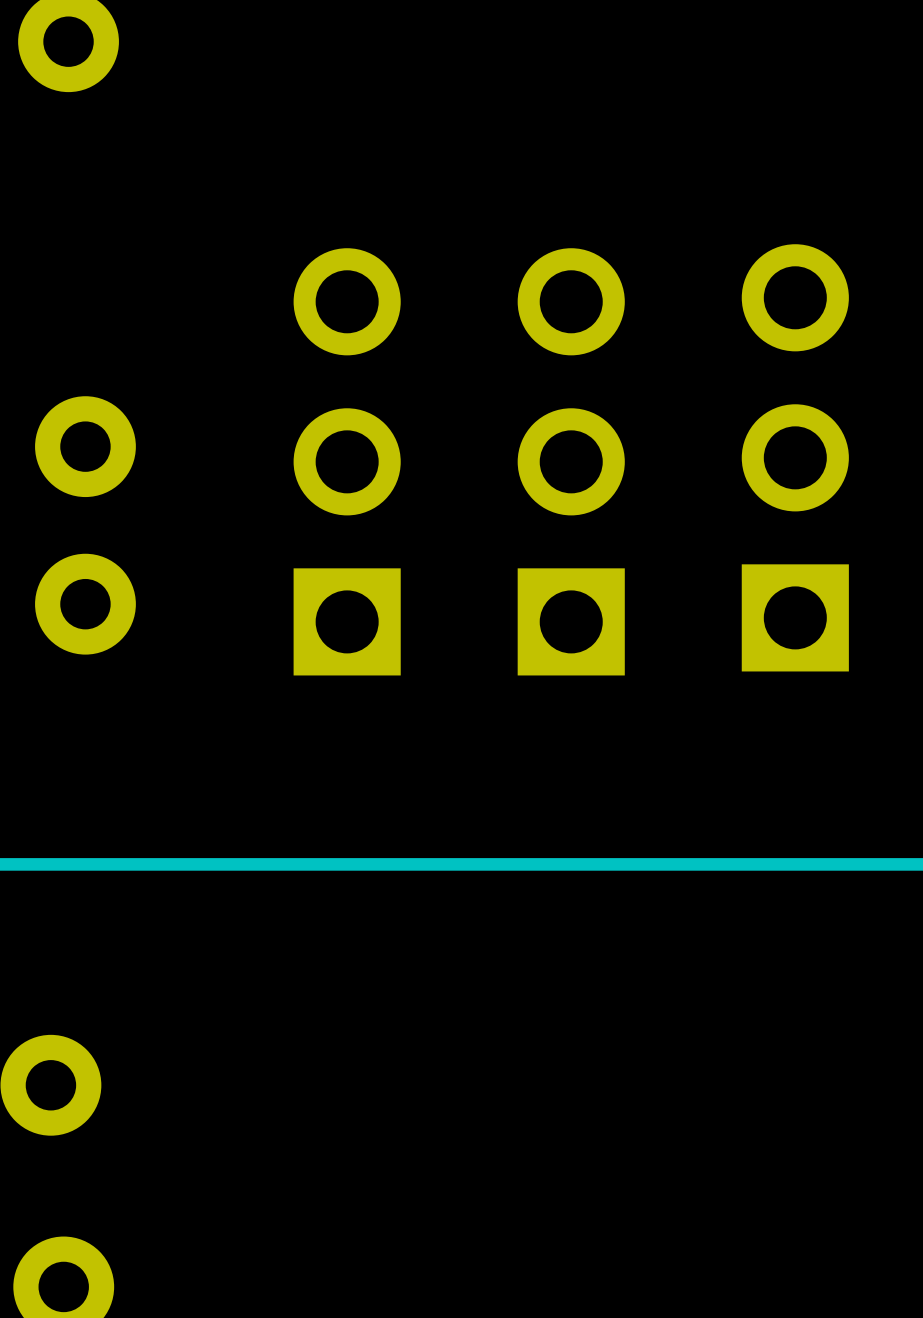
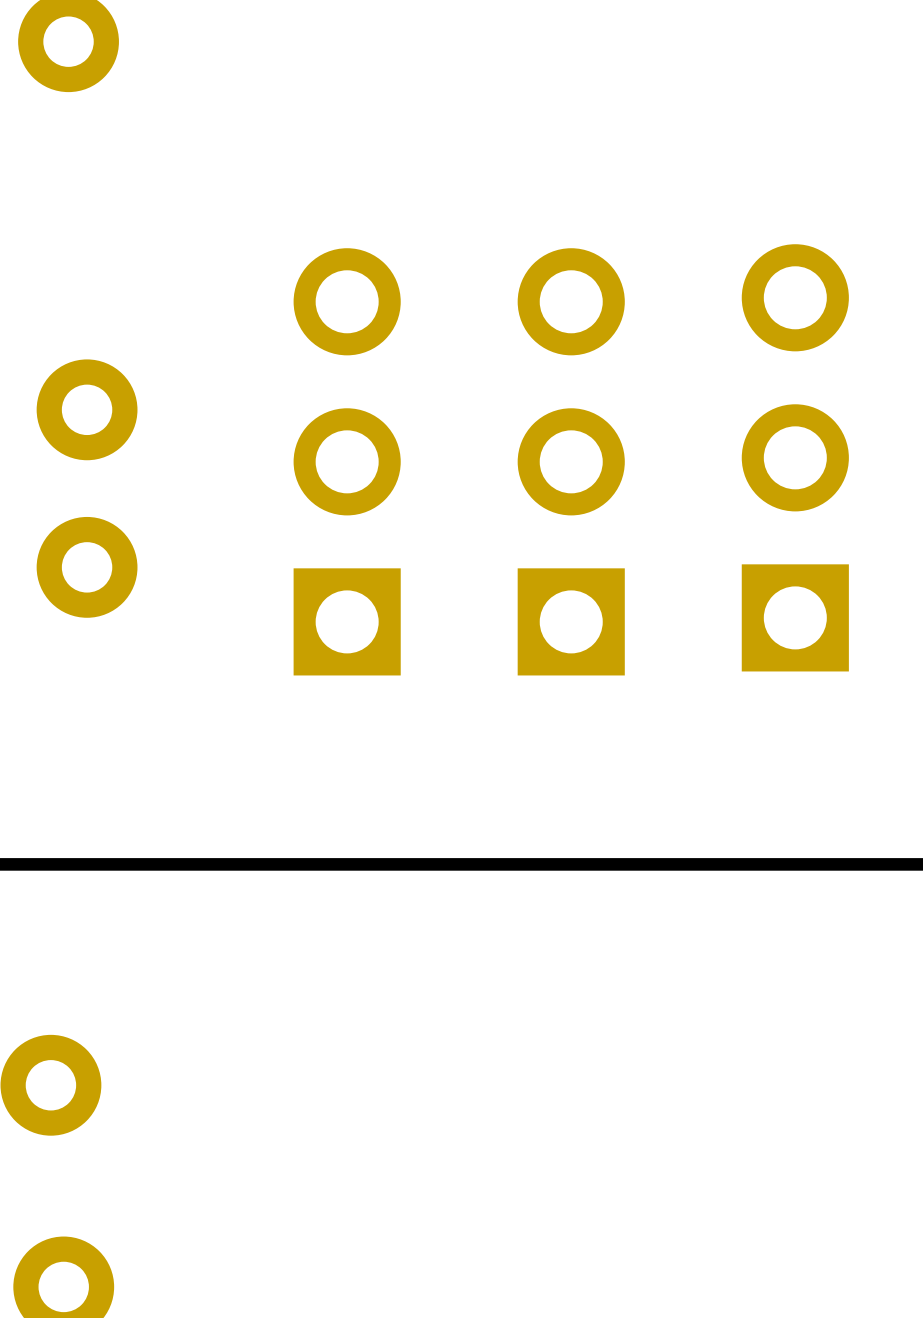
part position: (85, 525) -> (87, 488)

